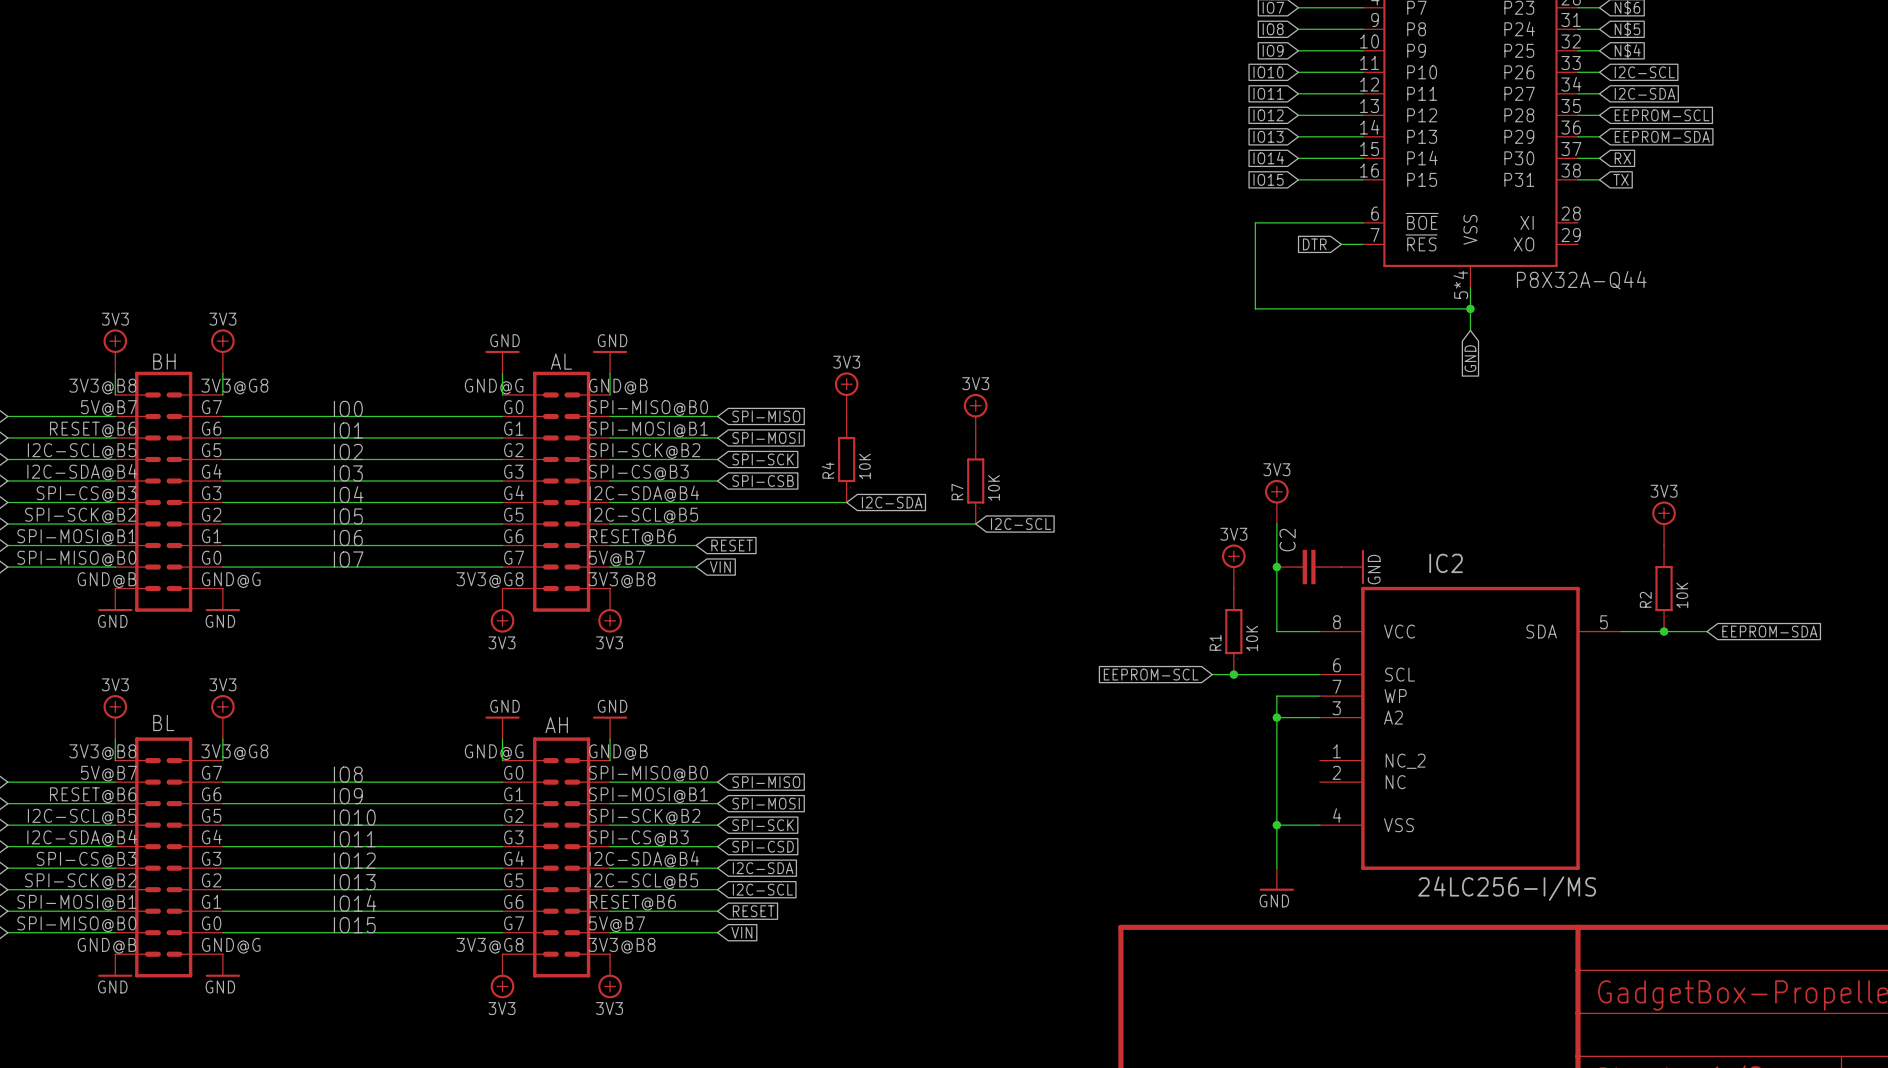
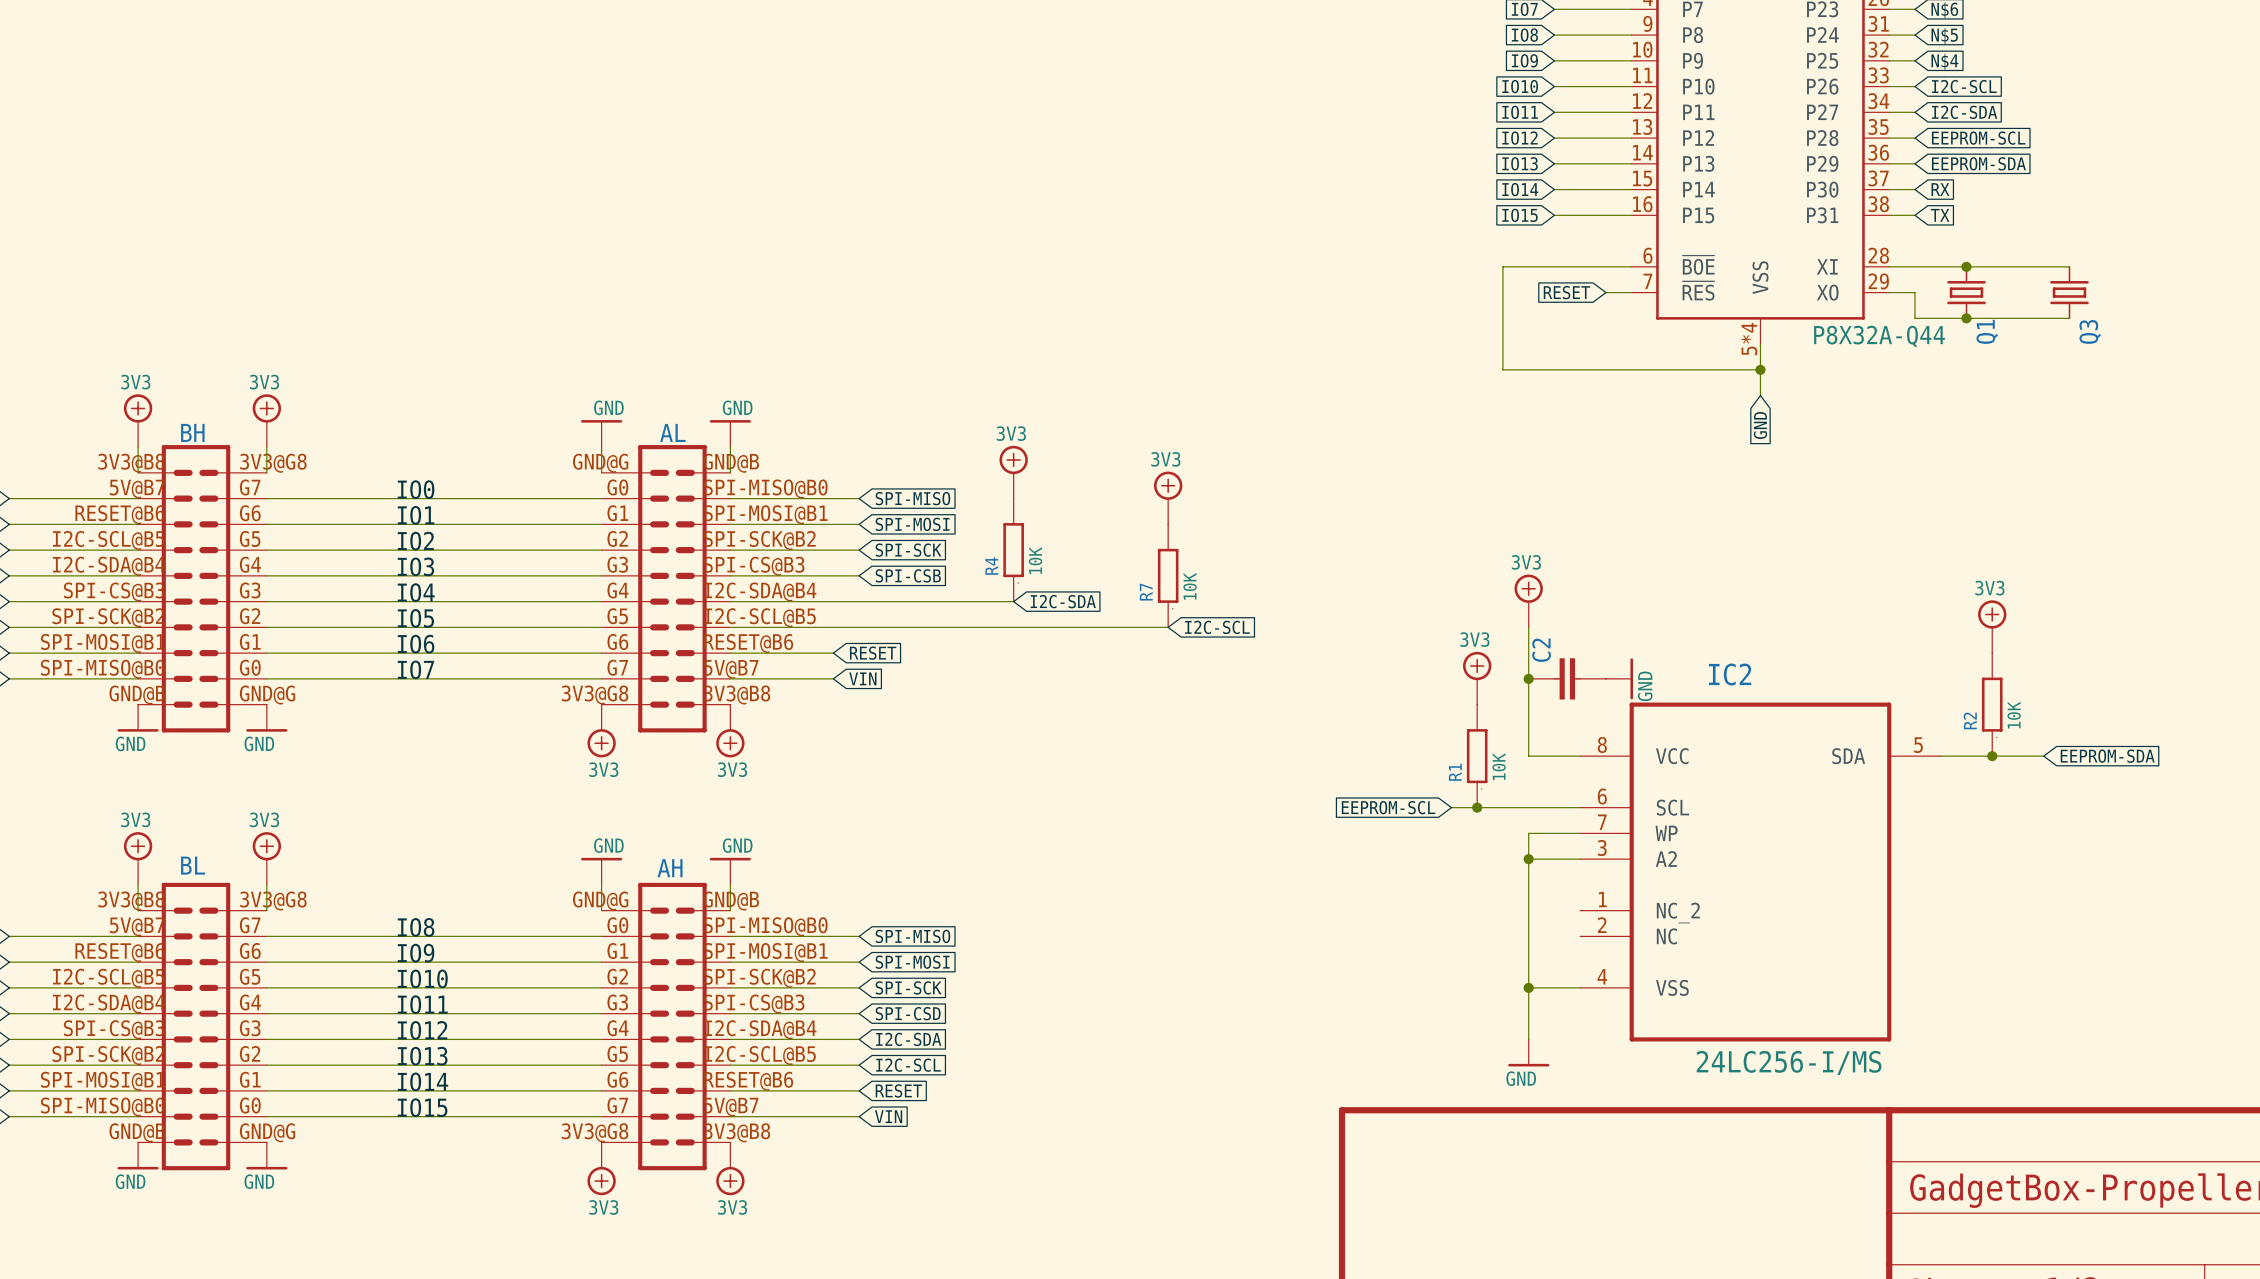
wire: none -> (1889, 266) (2069, 266)
junction: none -> (1966, 266)
global label: DTR (1314, 244) -> RESET (1566, 292)
wire: none -> (1889, 292) (1914, 292) (1914, 318) (2069, 318)
Q1: none -> (1966, 292)
Q3: none -> (2069, 292)
junction: none -> (1966, 318)

